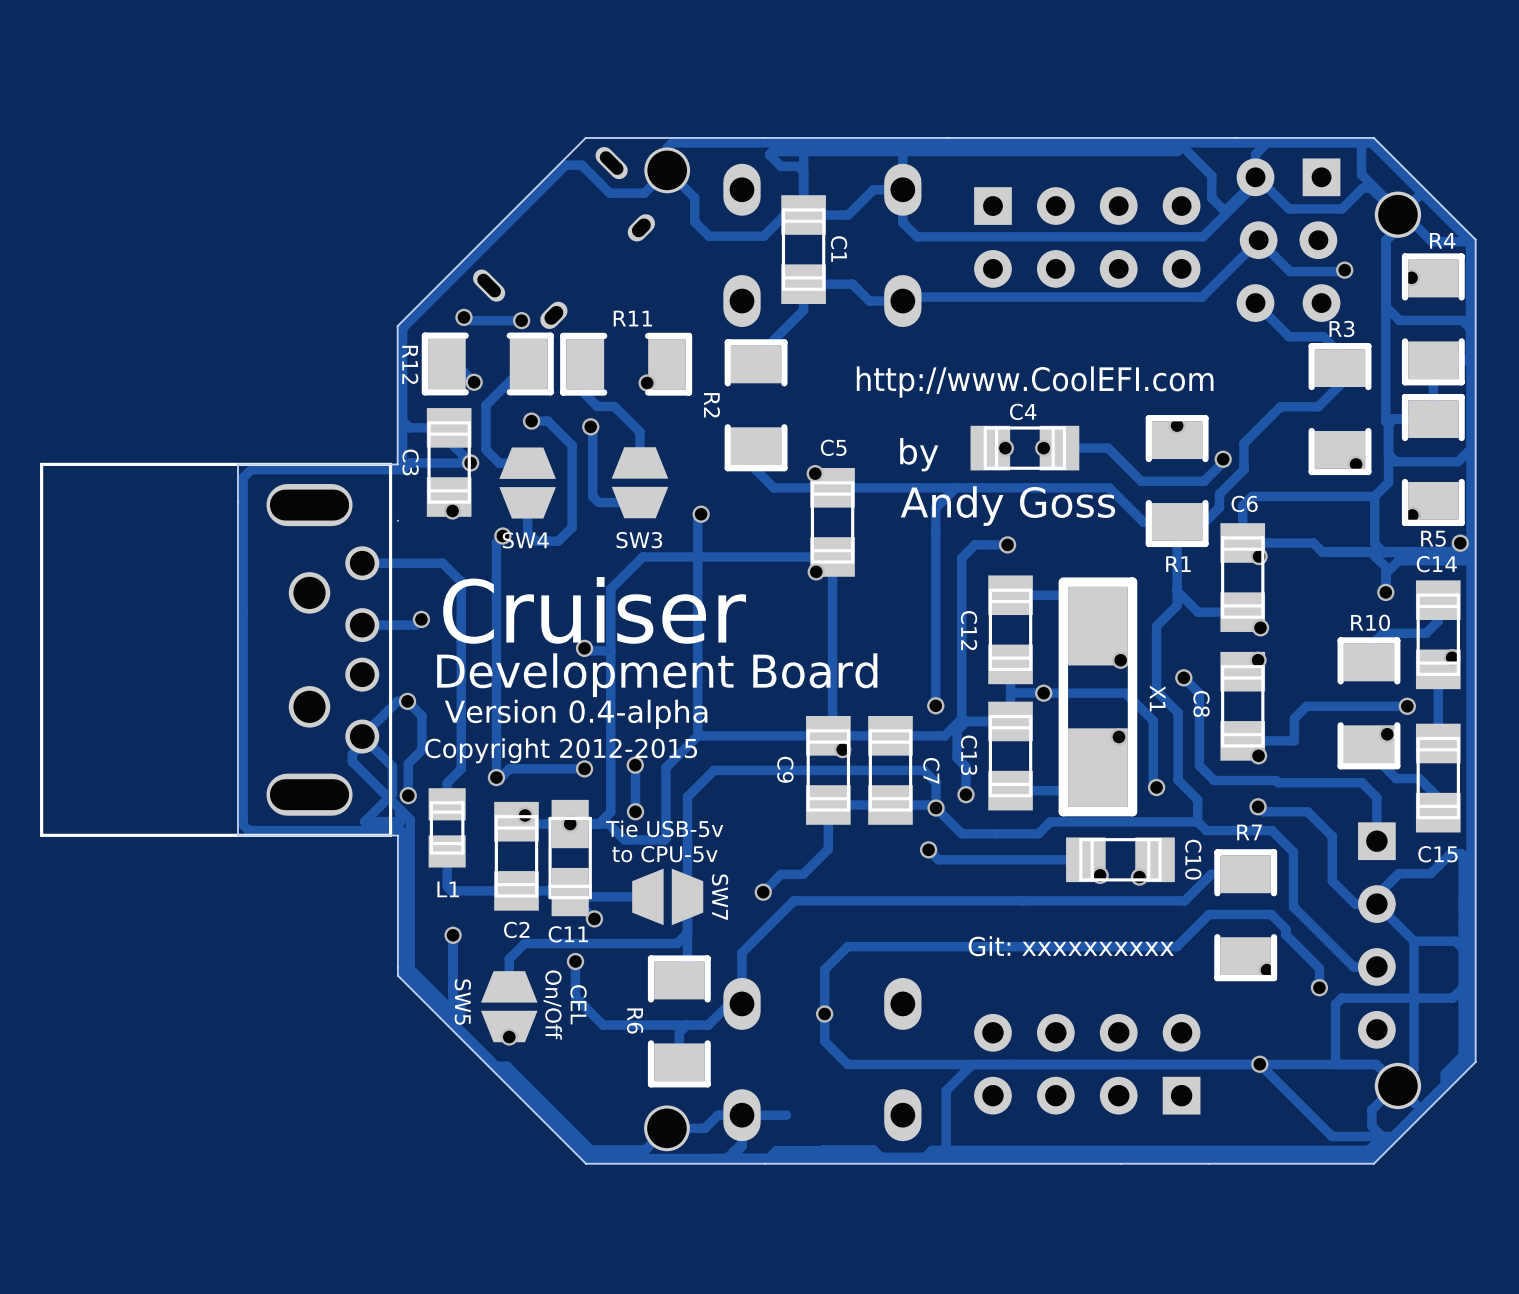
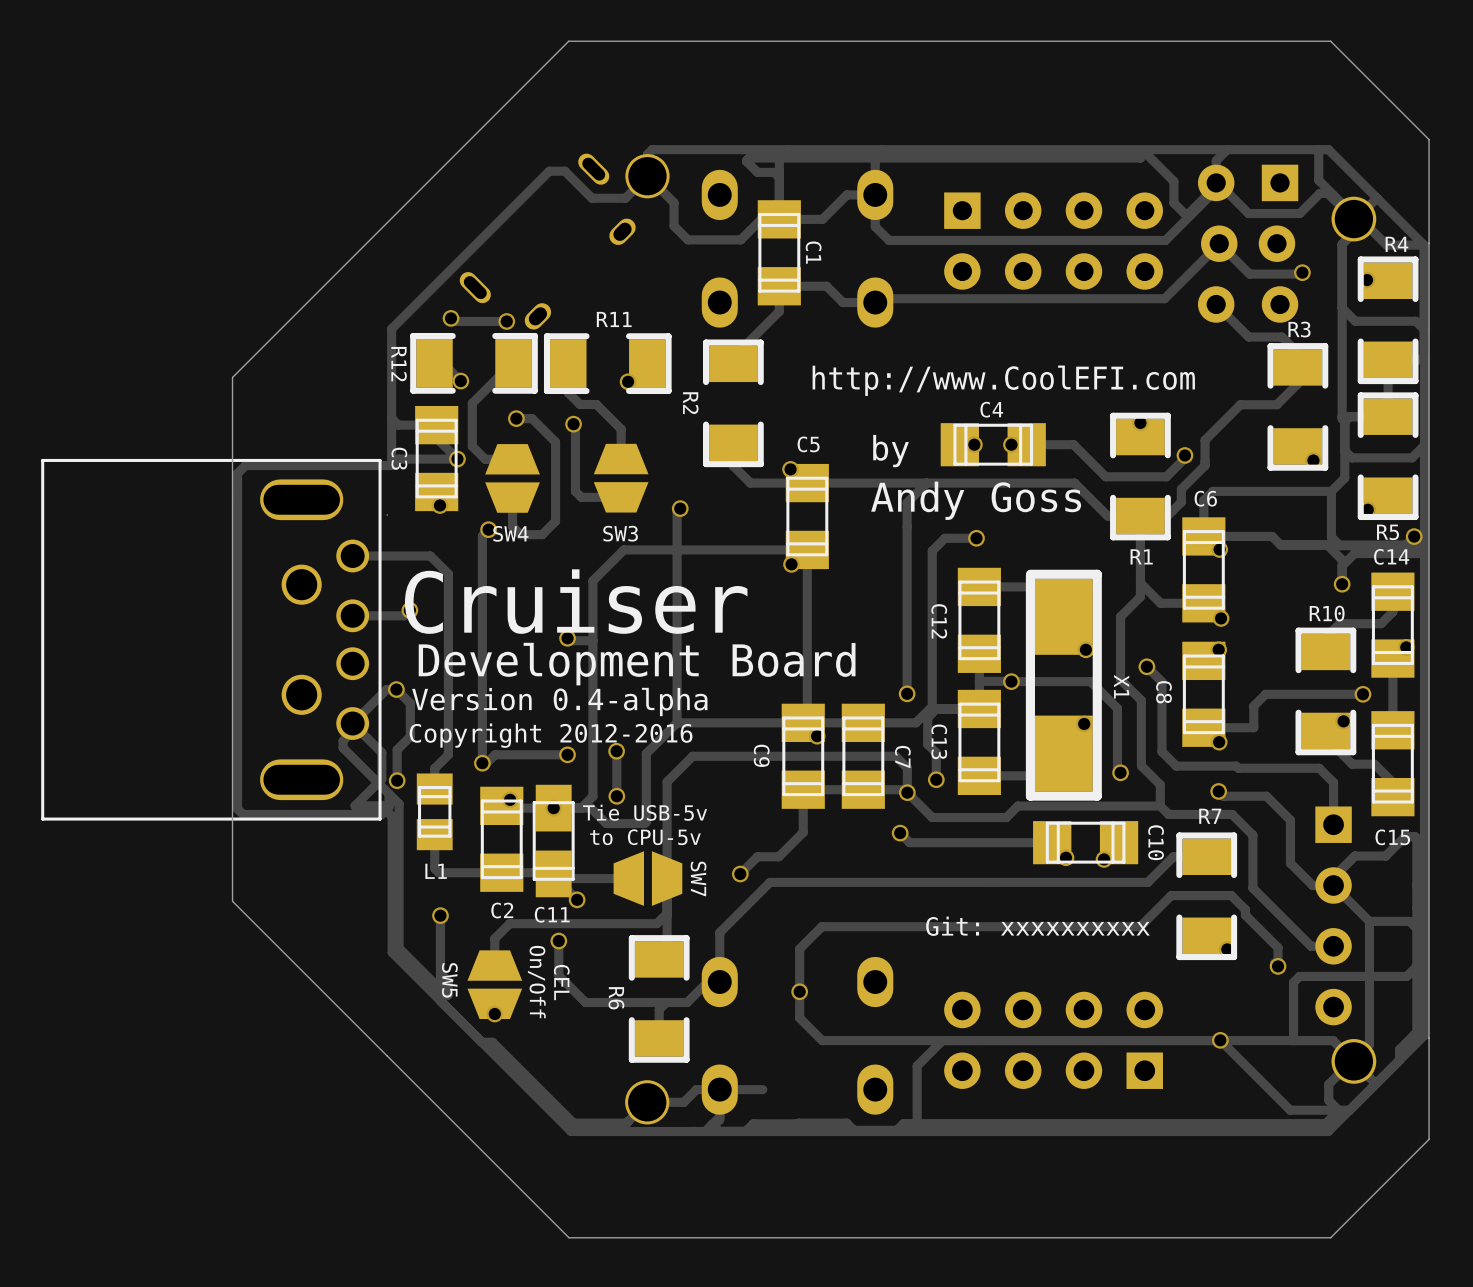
board edge: (1475, 239) (1373, 137) (585, 137) (397, 326) (397, 464) (237, 464) -> (1429, 243) (1429, 139) (1330, 41) (568, 41) (232, 377) (232, 460)
text: Copyright 2012-2015 (561, 750) -> Copyright 2012-2016 (551, 735)
board edge: (237, 835) (397, 835) (397, 975) (586, 1163) (1373, 1163) (1475, 1062) -> (232, 819) (232, 901) (568, 1237) (1330, 1237) (1429, 1139) (1429, 1038)

